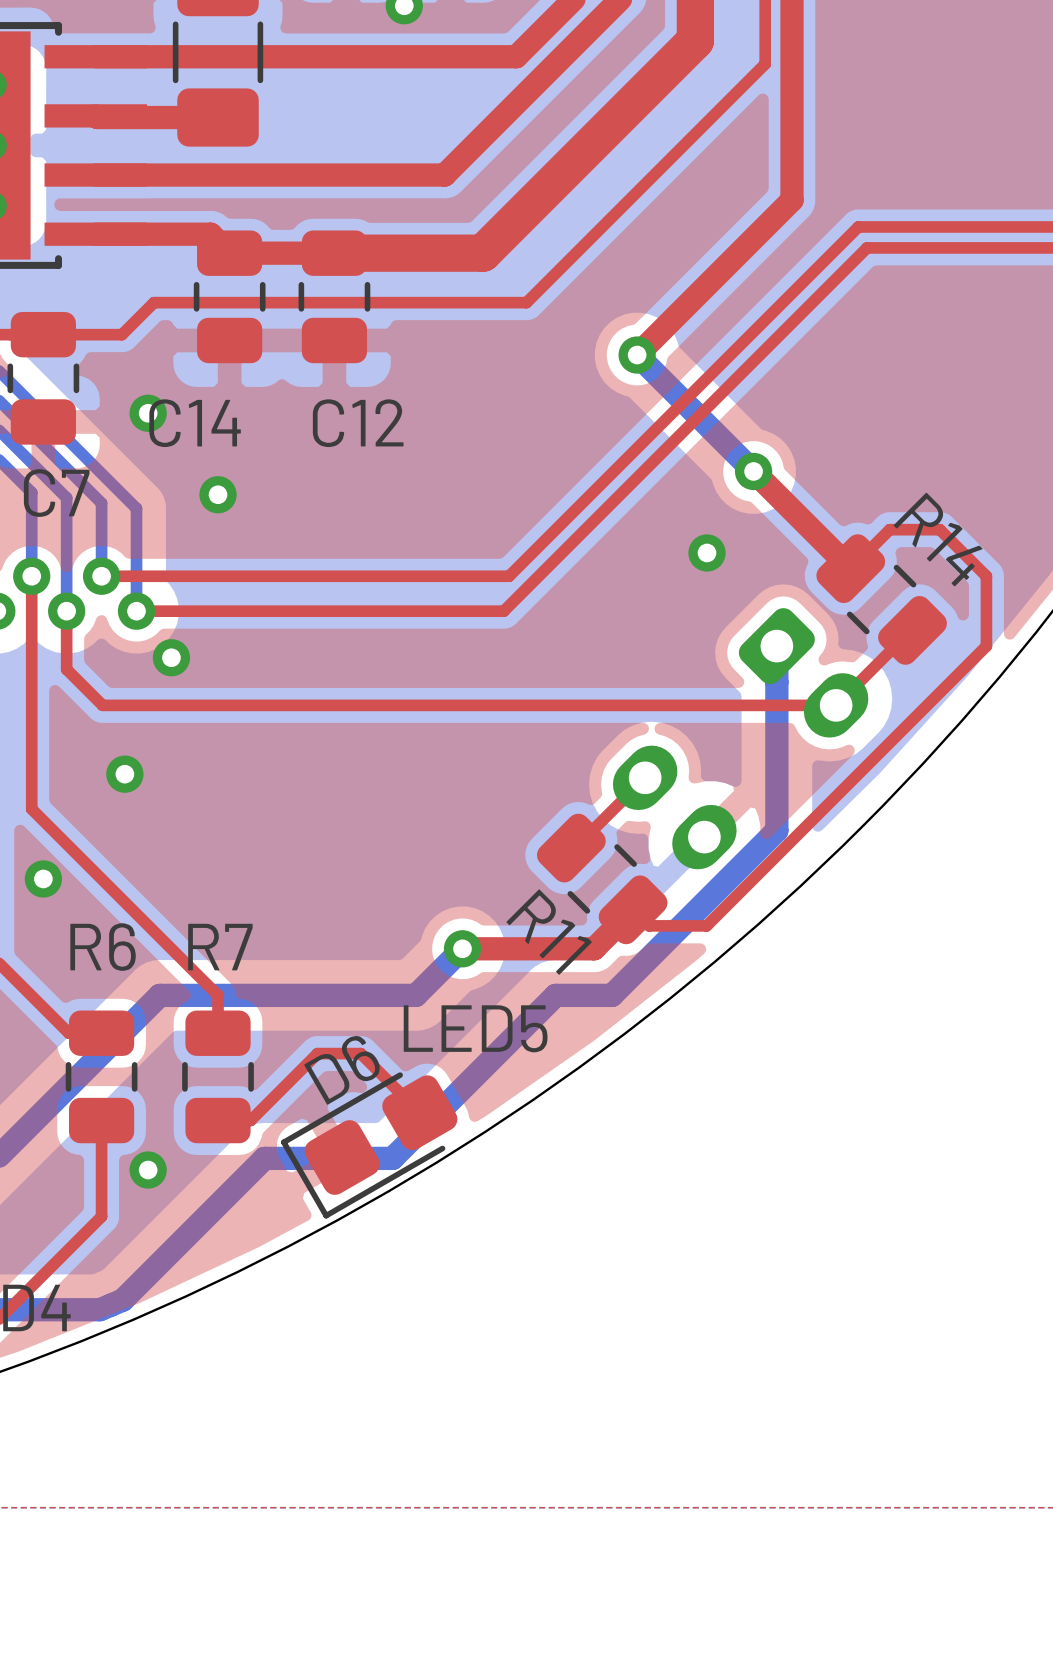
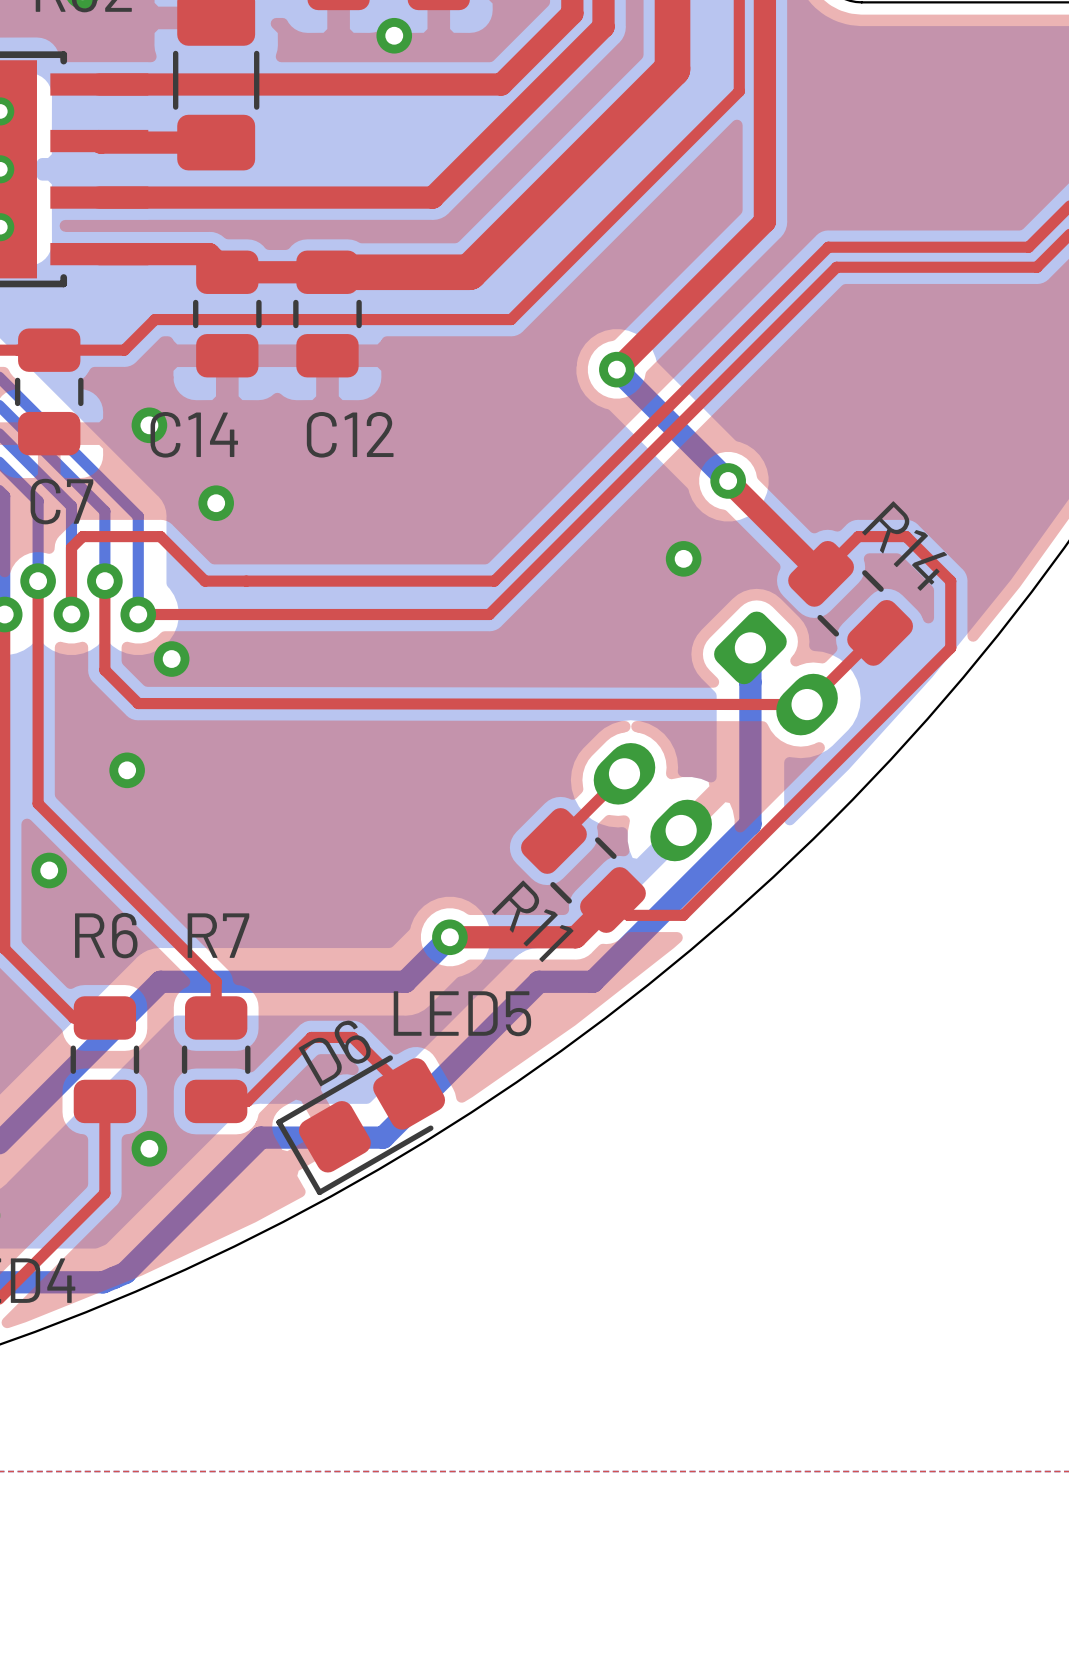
top track: (101, 576) (206, 576) -> (71, 614) (71, 547) (82, 536) (160, 536) (205, 581)
top track: (66, 611) (66, 669) (102, 705) (836, 705) -> (104, 581) (104, 670) (138, 703) (807, 704)

